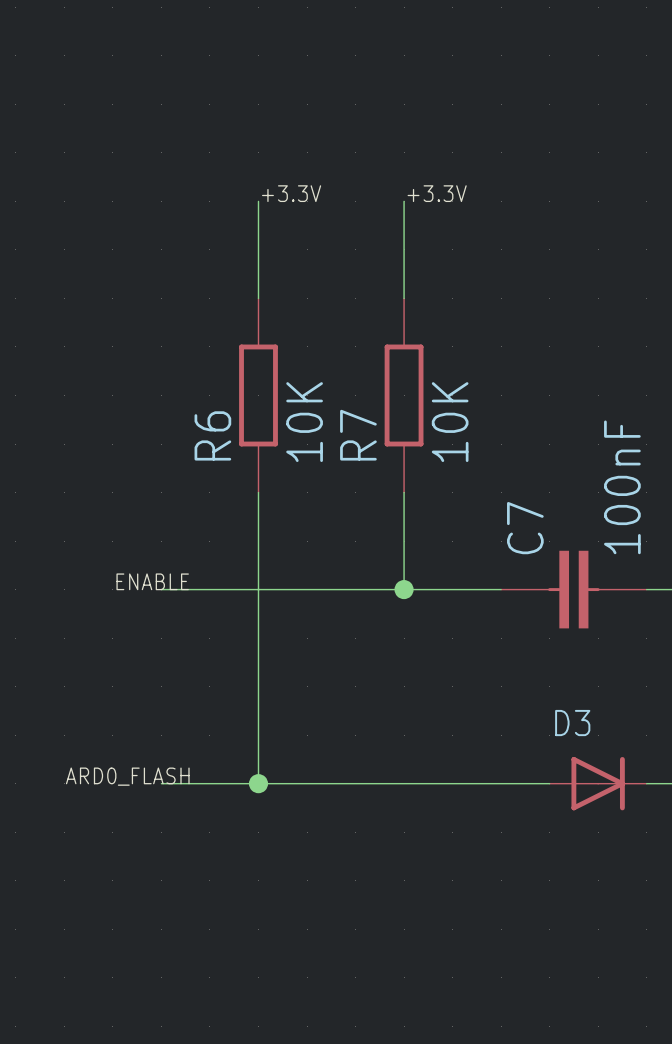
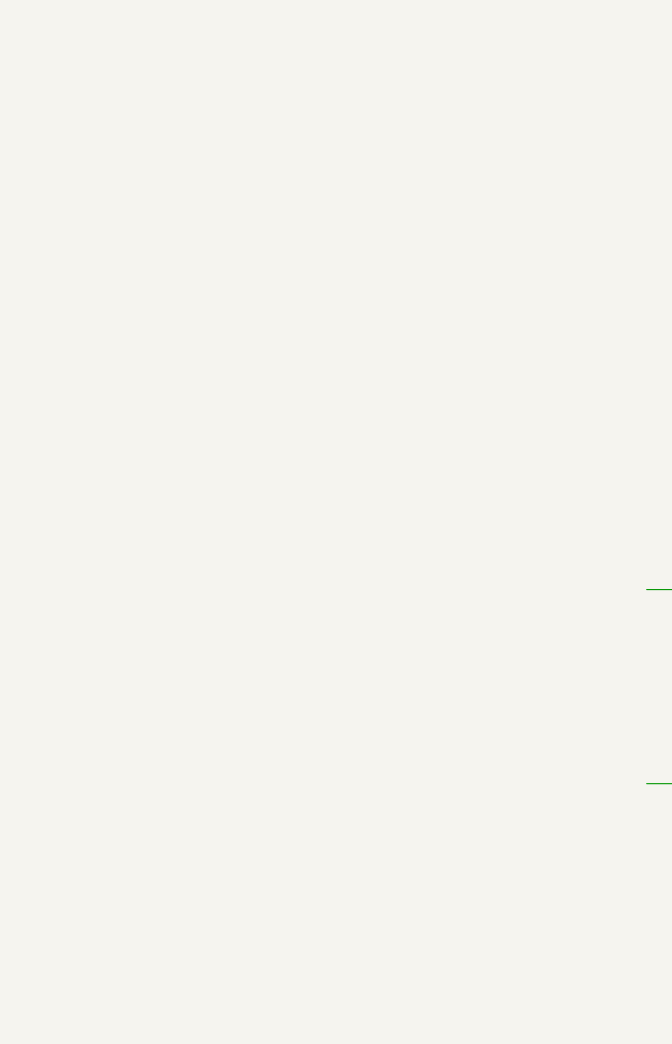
label: +3.3V (291, 193) -> none
label: +3.3V (437, 193) -> none
wire: (258, 201) (258, 298) -> none
wire: (404, 201) (404, 298) -> none
R6: 10K (258, 395) -> none
R7: 10K (404, 395) -> none
wire: (258, 492) (258, 783) -> none
wire: (404, 492) (404, 589) -> none
label: ENABLE (152, 581) -> none
wire: (161, 589) (501, 589) -> none
junction: (404, 589) -> none
C7: 100nF (573, 589) -> none
label: ARD0_FLASH (127, 776) -> none
wire: (161, 783) (549, 783) -> none
junction: (258, 783) -> none
D3: (598, 783) -> none

